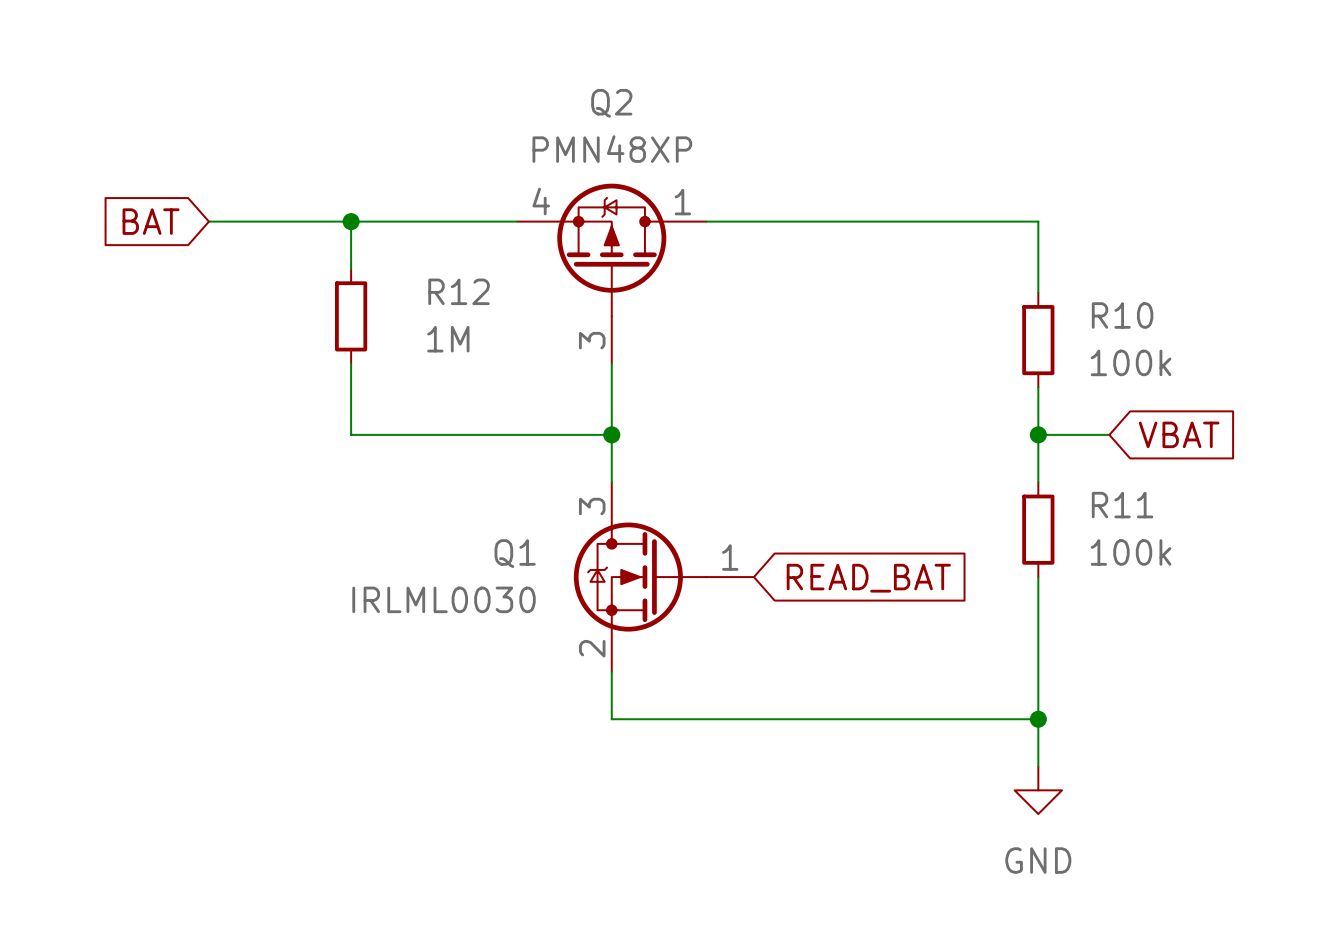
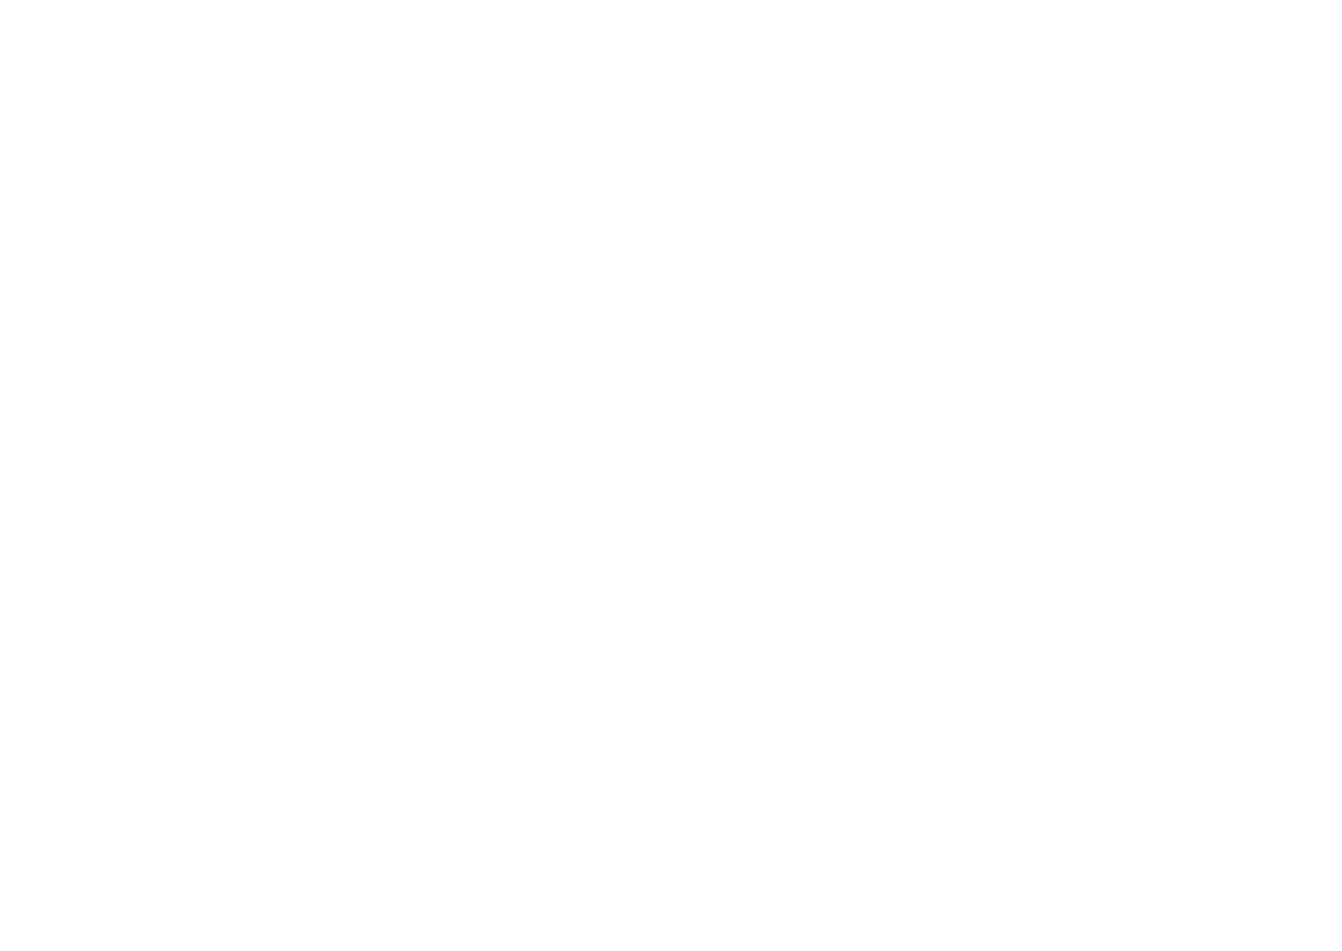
global label: BAT (151, 221) -> none
wire: (208, 221) (516, 221) -> none
wire: (351, 221) (351, 269) -> none
junction: (351, 221) -> none
wire: (706, 221) (1038, 221) (1038, 292) -> none
Q2: PMN48XP (611, 273) -> none
R12: 1M (351, 316) -> none
R10: 100k (1038, 340) -> none
wire: (351, 363) (351, 434) (611, 434) -> none
wire: (611, 363) (611, 482) -> none
wire: (1038, 387) (1038, 482) -> none
junction: (611, 434) -> none
wire: (1038, 434) (1109, 434) -> none
junction: (1038, 434) -> none
global label: VBAT (1179, 434) -> none
R11: 100k (1038, 529) -> none
Q1: IRLML0030 (663, 577) -> none
wire: (1038, 577) (1038, 766) -> none
global label: READ_BAT (868, 578) -> none
wire: (611, 671) (611, 719) (1038, 719) -> none
junction: (1038, 719) -> none
power symbol: GND (1038, 790) -> none

